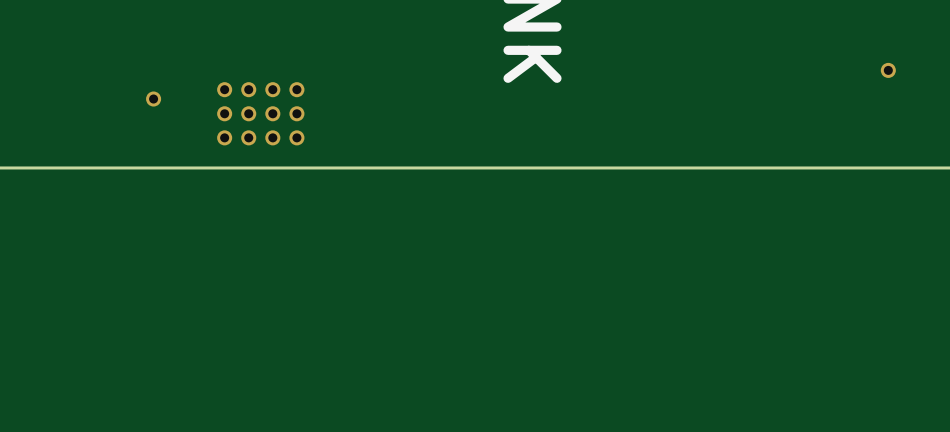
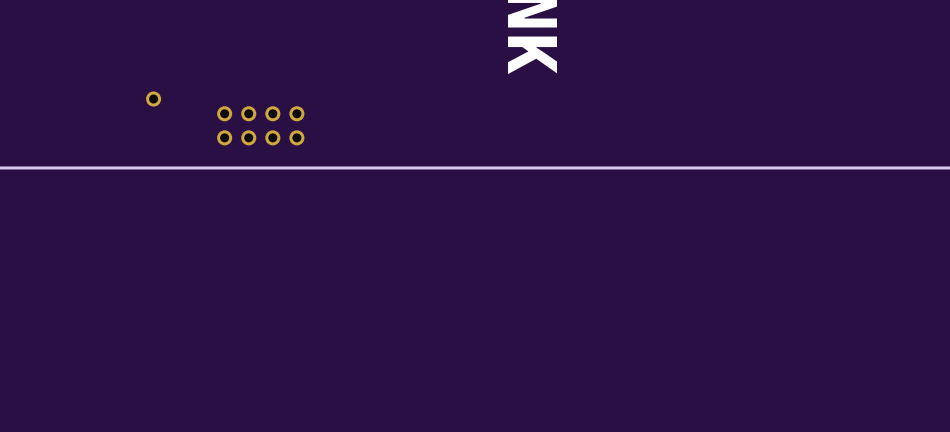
via: (888, 70) -> none
via: (224, 89) -> none
via: (248, 89) -> none
via: (272, 89) -> none
via: (296, 89) -> none

